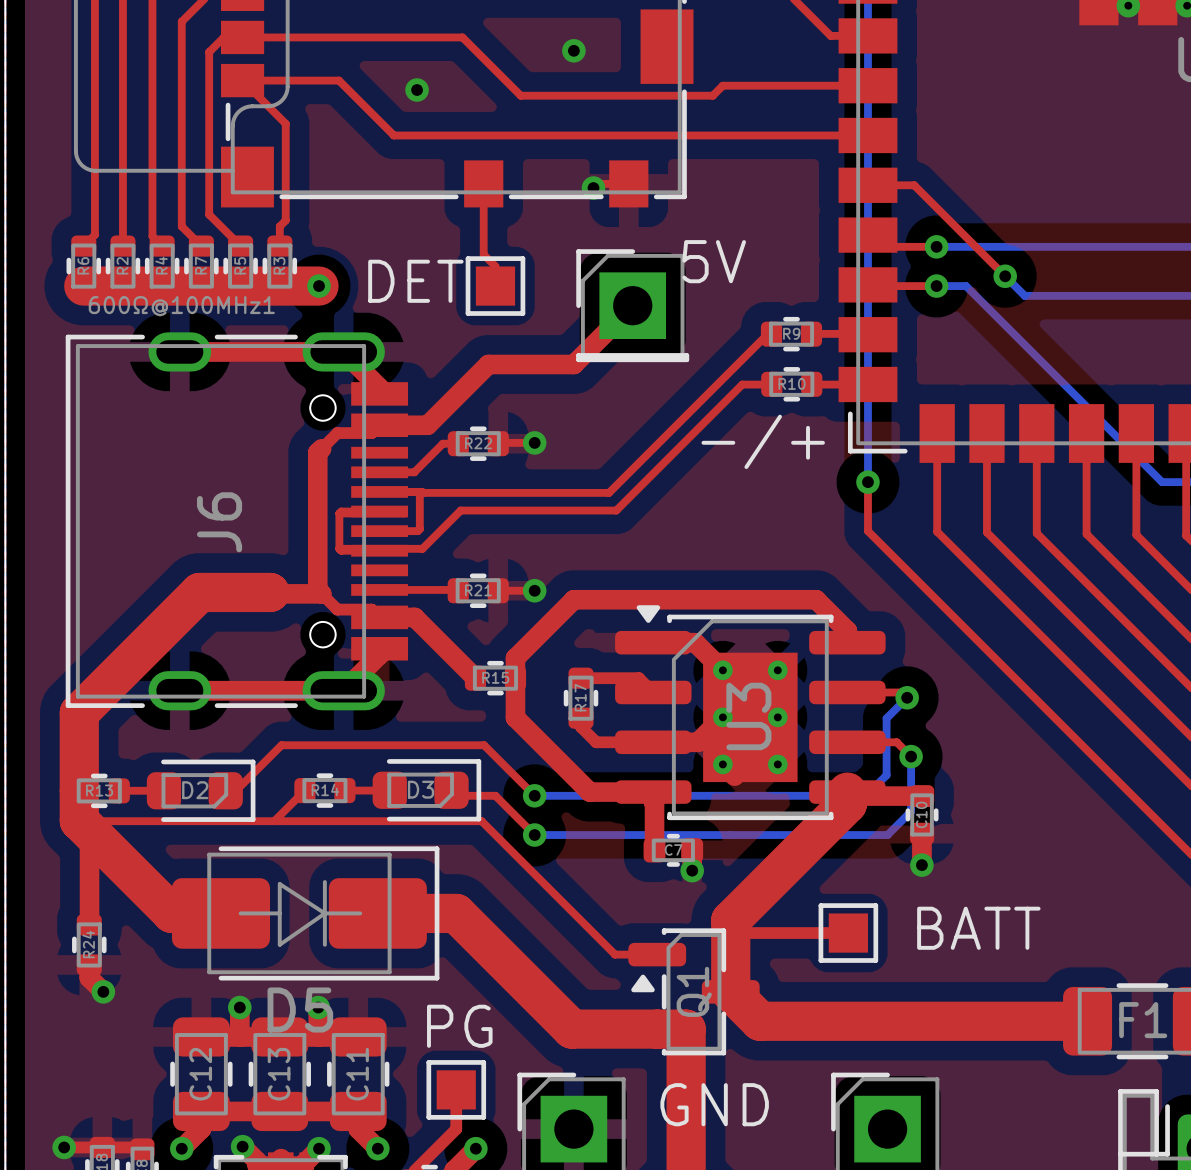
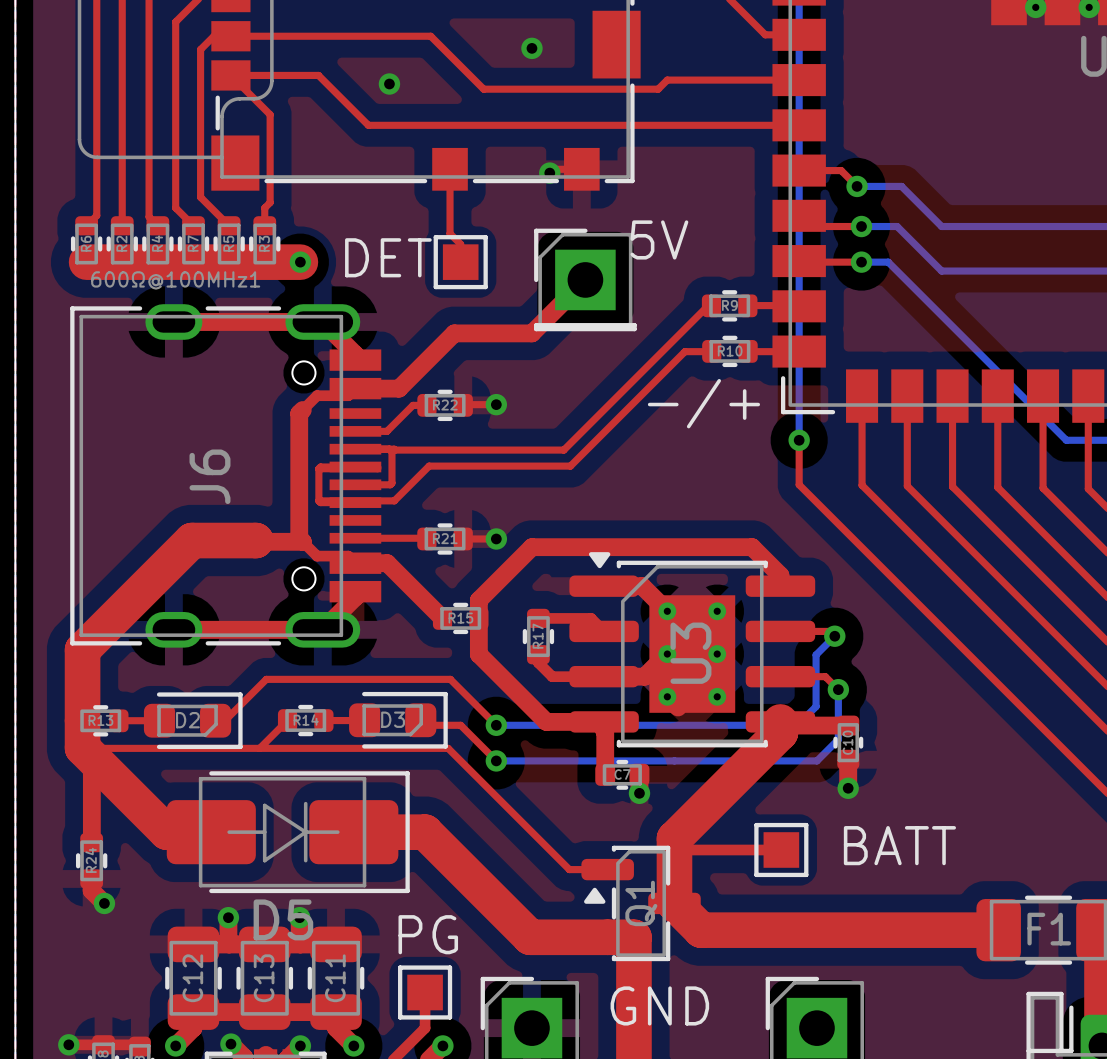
top track: (931, 202) (1005, 276) -> none
bottom track: none -> (857, 186) (901, 186) (941, 226)
bottom track: (975, 246) (1024, 246) -> (897, 226) (923, 253)
via position: (1005, 276) -> (857, 186)

